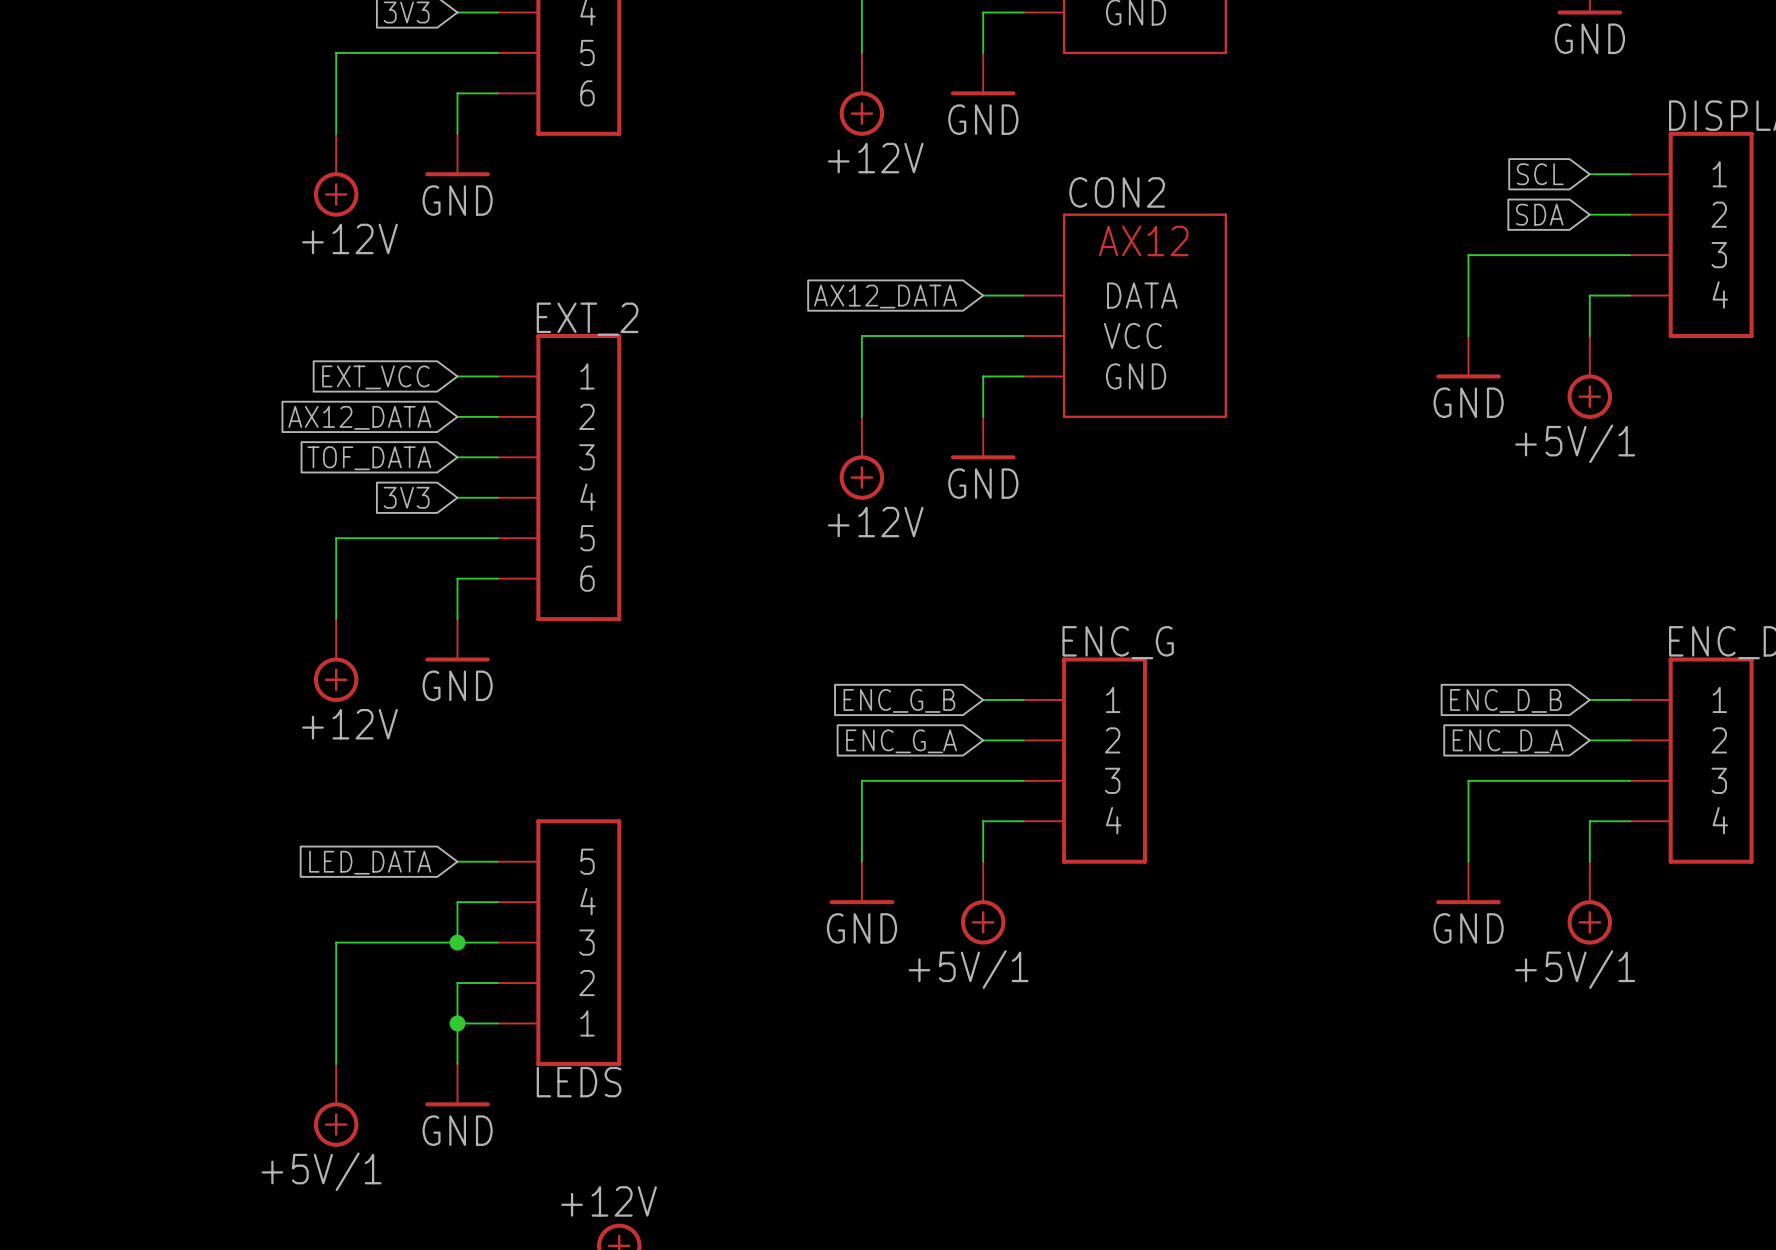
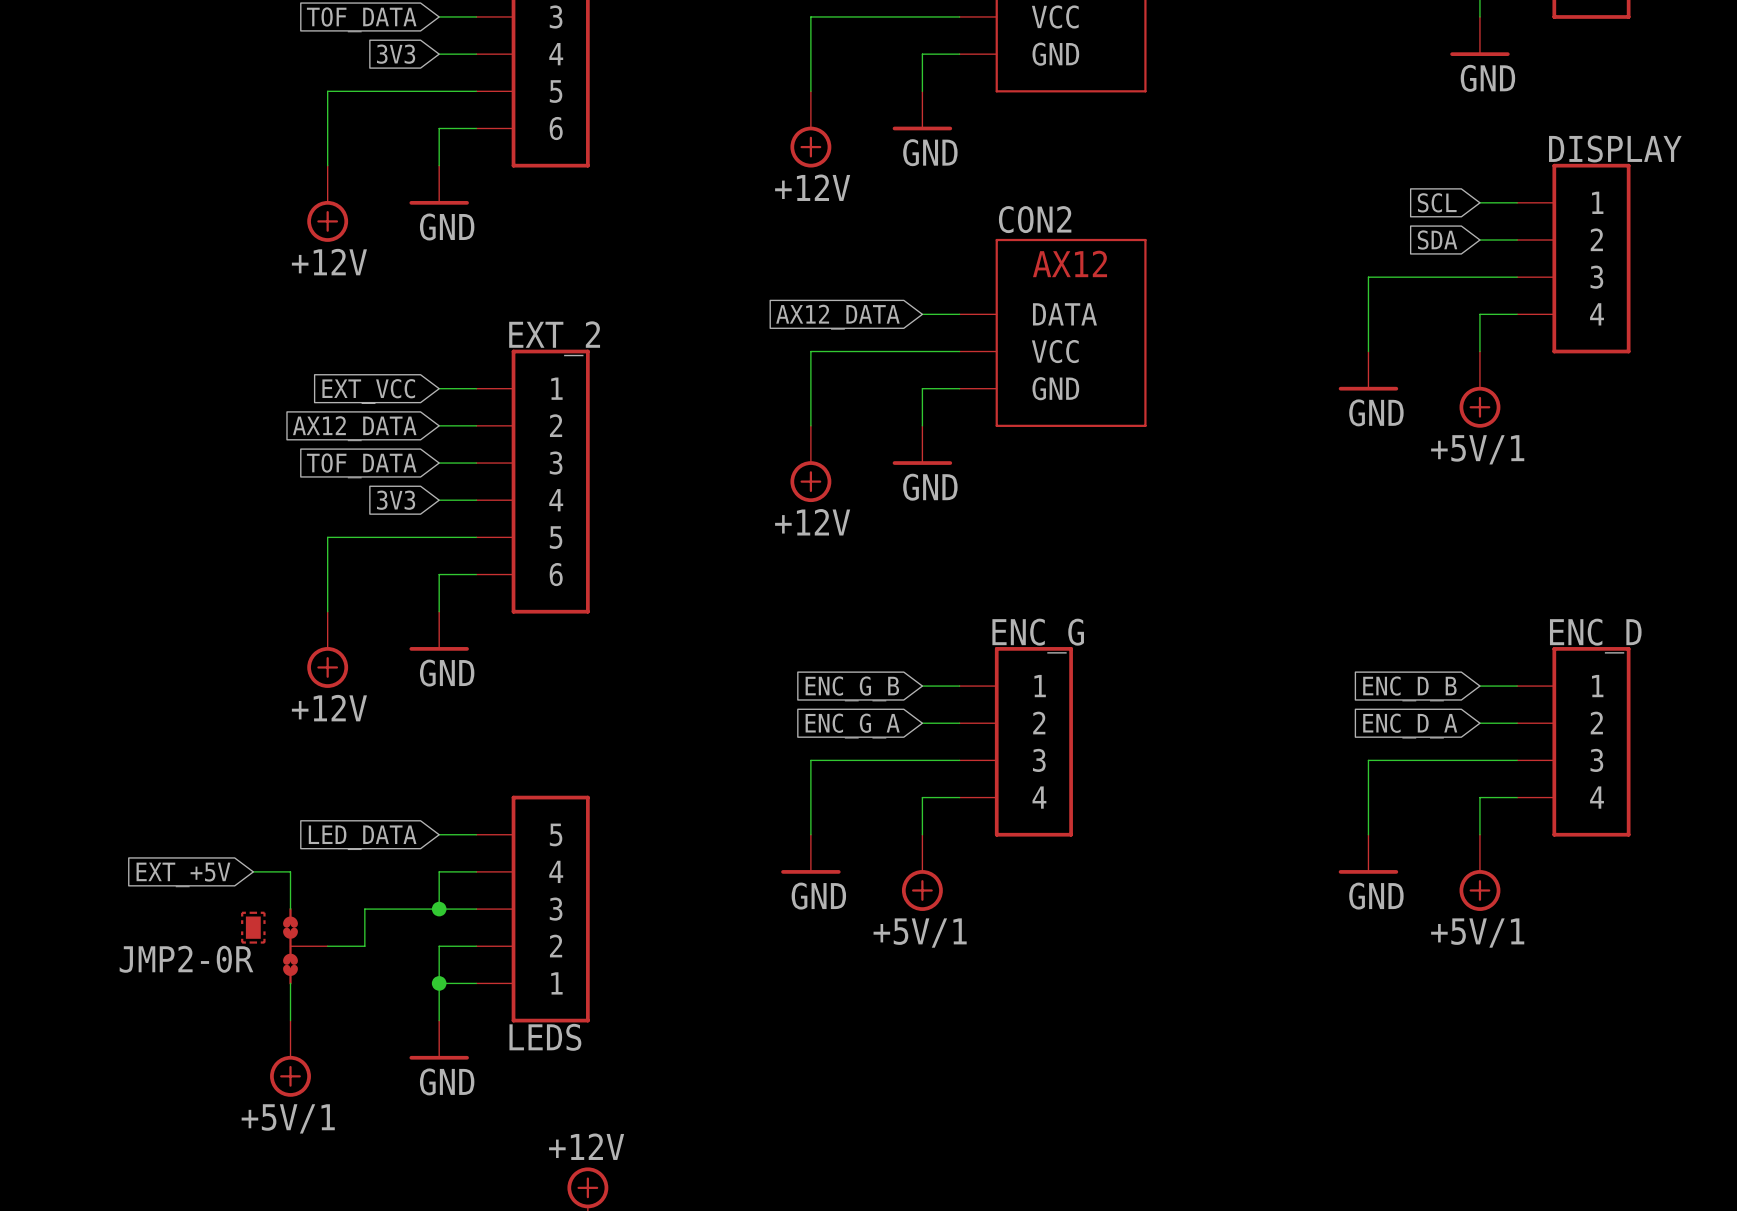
wire: none -> (253, 871) (290, 871) (290, 909)
global label: none -> EXT_+5V (183, 874)
wire: (376, 942) (336, 942) (336, 1063) -> (364, 909) (364, 946) (327, 946)
part: none -> (253, 927)
JMP2-0R: none -> (305, 946)
wire: none -> (290, 983) (290, 1020)
power symbol position: +5V/1 (336, 1105) -> +5V/1 (290, 1058)

